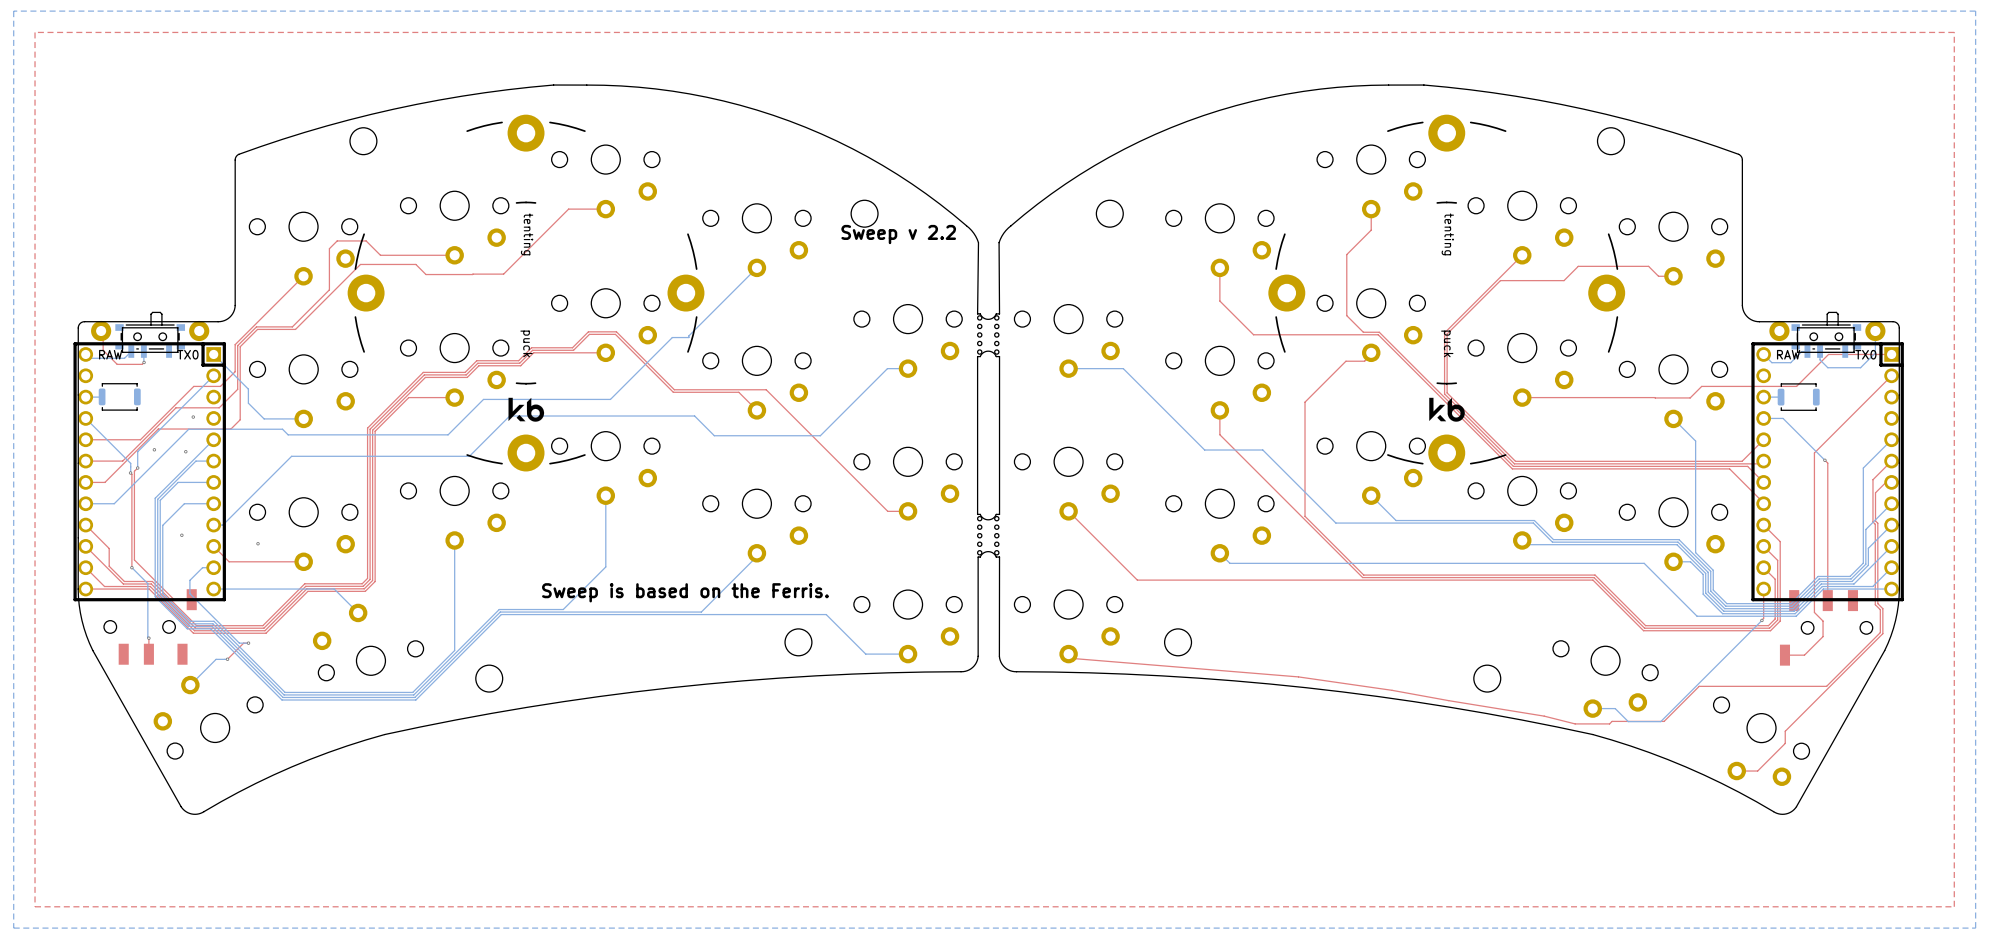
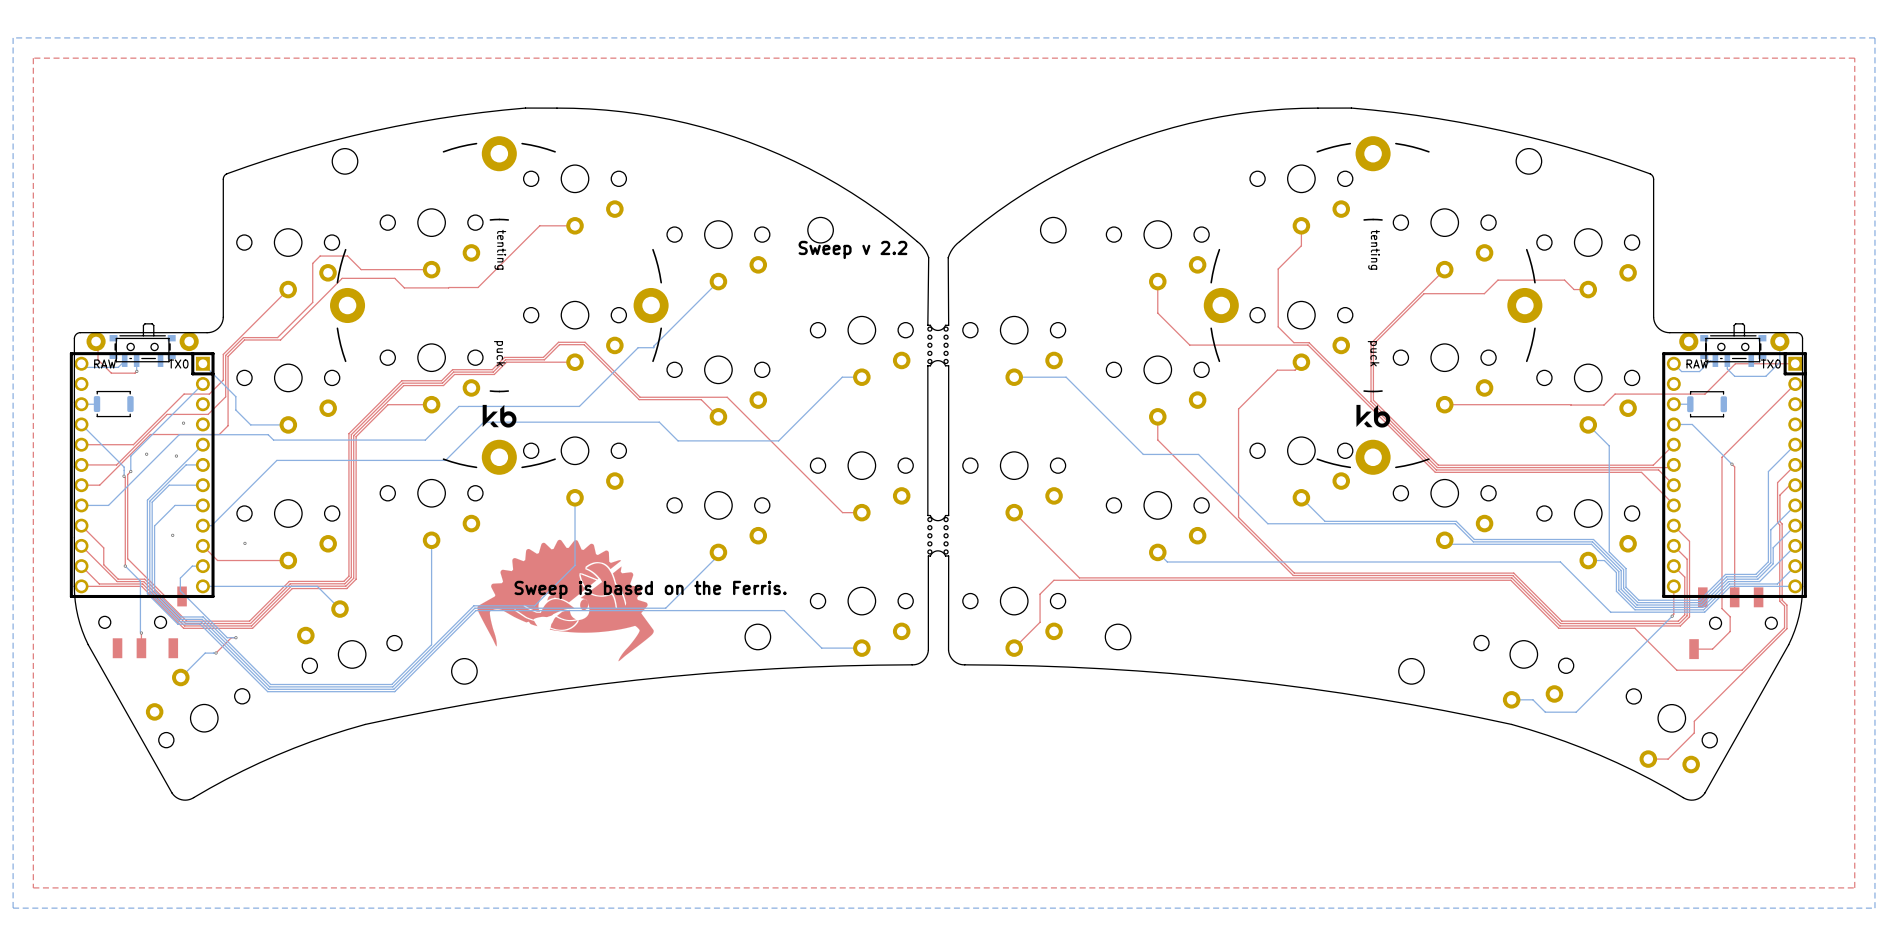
drawing: none -> [477, 539, 654, 662]
top track: (1068, 654) (1073, 658) (1298, 676) (1544, 716) (1575, 723) (1664, 721) (1699, 686) (1826, 686) (1835, 677) -> (1014, 648) (1040, 622) (1040, 594) (1053, 580) (1510, 580) (1558, 628) (1634, 628) (1676, 670) (1742, 670)

